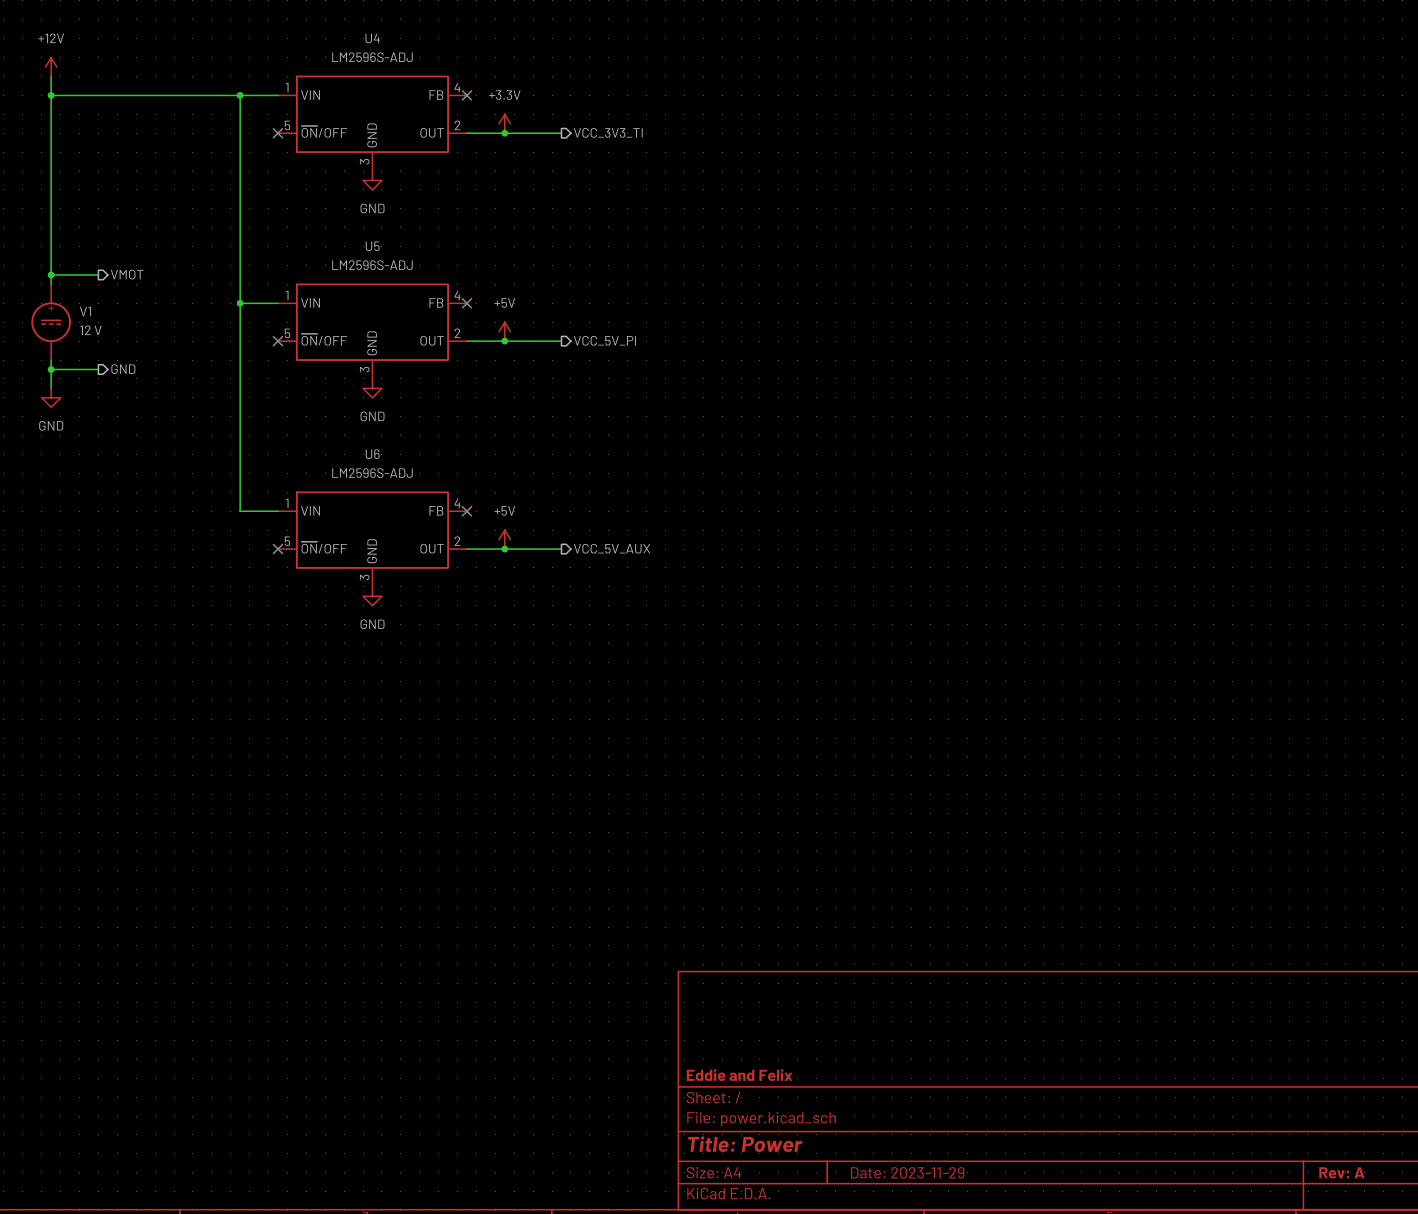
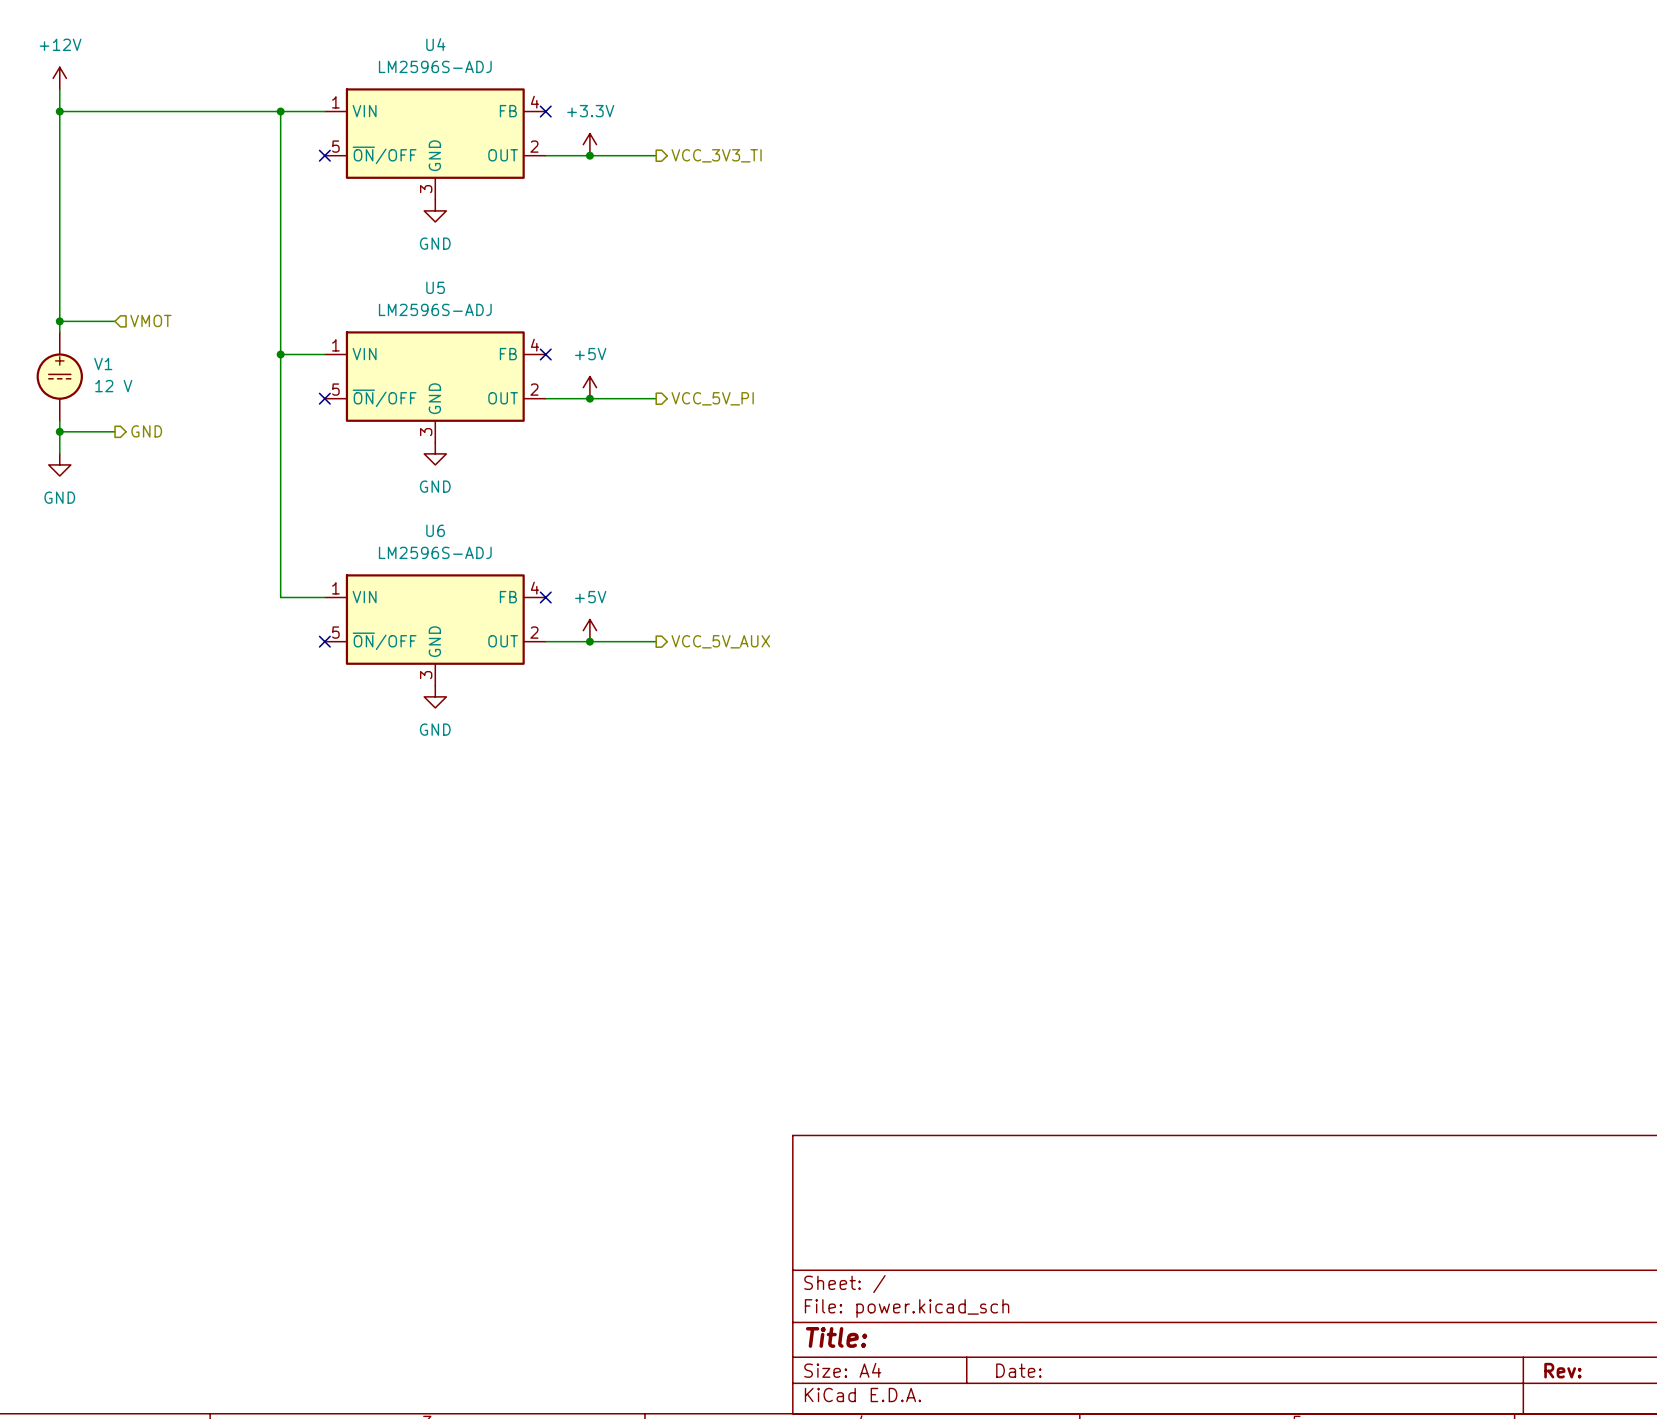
hierarchical label shape: output (127, 274) -> input (150, 320)
title block: Eddie and Felix (739, 1075) -> none
title block: Title: Power (745, 1144) -> Title: (836, 1337)
title block: Date: 2023-11-29 (907, 1172) -> Date: (1018, 1370)
title block: Rev: A (1341, 1172) -> Rev: (1562, 1370)

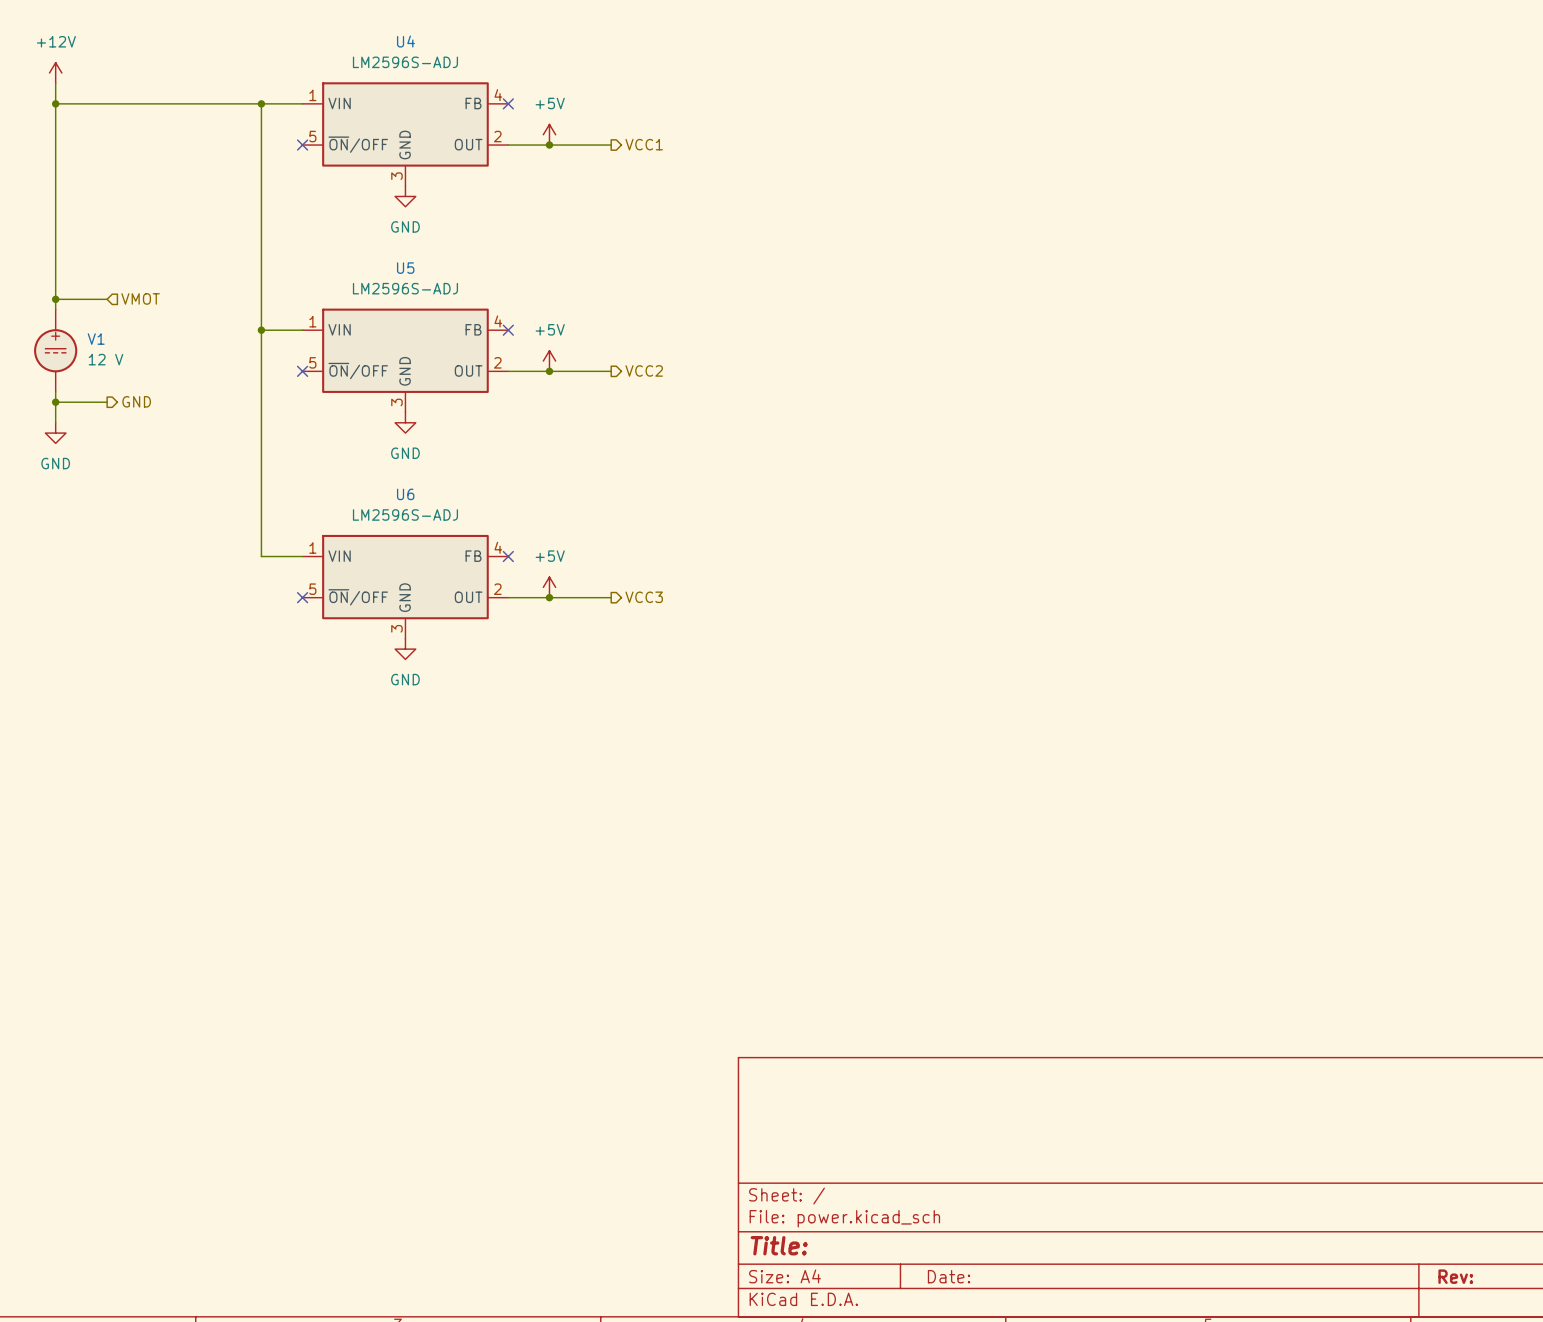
power symbol: +3.3V (589, 144) -> +5V (549, 134)
hierarchical label: VCC_3V3_TI (716, 155) -> VCC1 (644, 144)
hierarchical label: VCC_5V_PI (712, 398) -> VCC2 (644, 370)
hierarchical label: VCC_5V_AUX (720, 641) -> VCC3 (644, 597)

